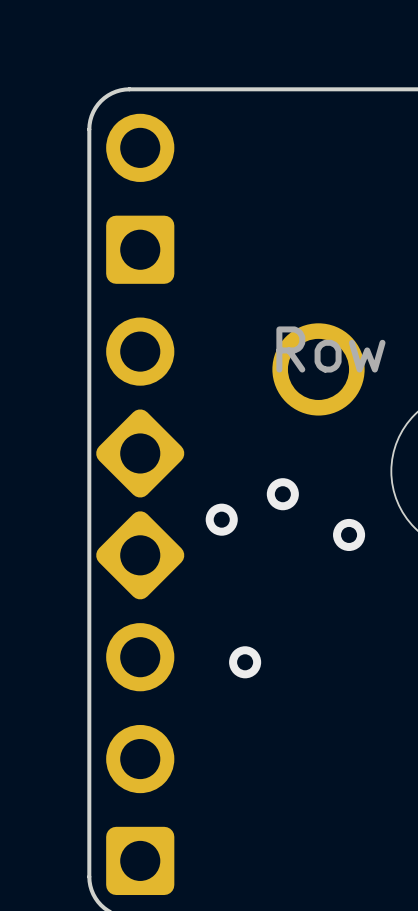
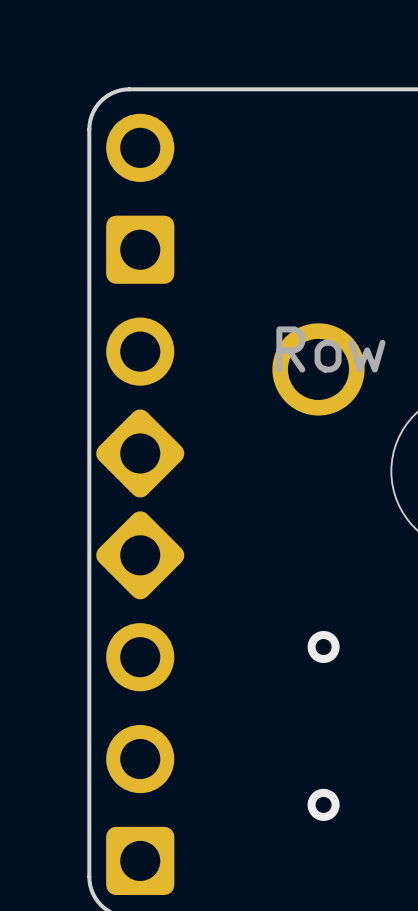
via: (282, 494) -> none
via: (221, 519) -> none
via: (349, 534) -> none
via: none -> (323, 647)
via: (245, 662) -> none
via: none -> (323, 804)

